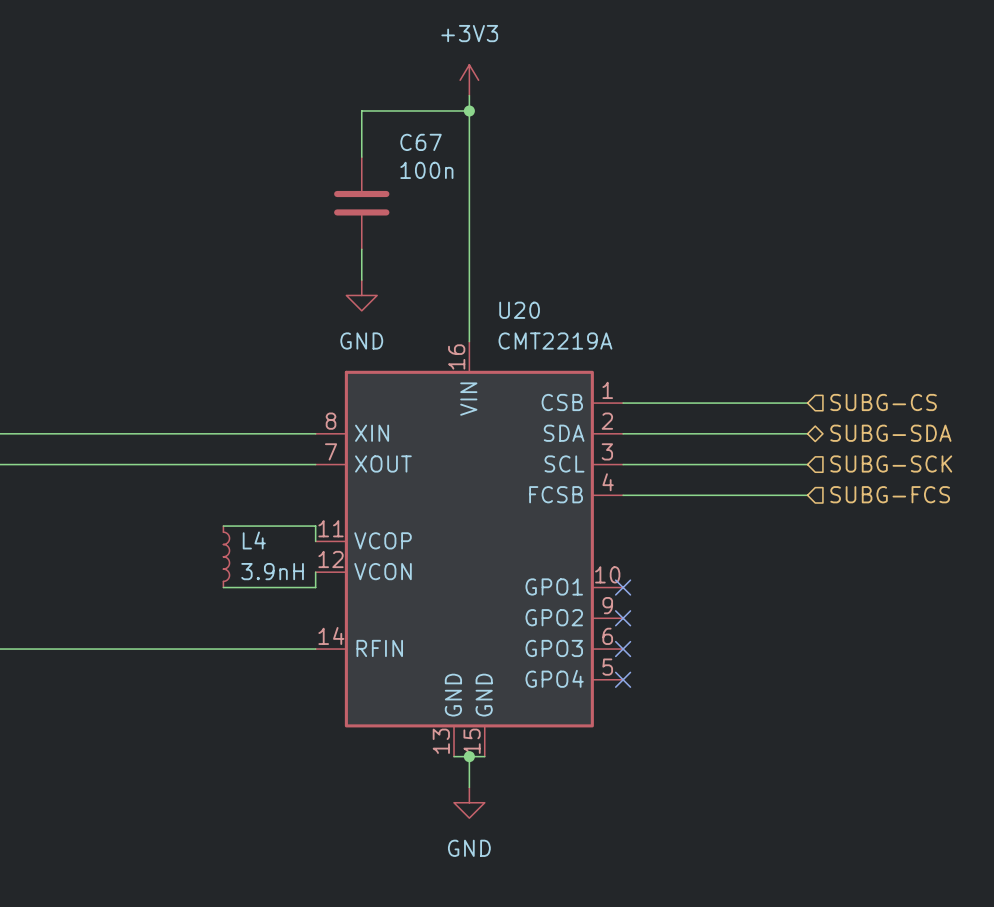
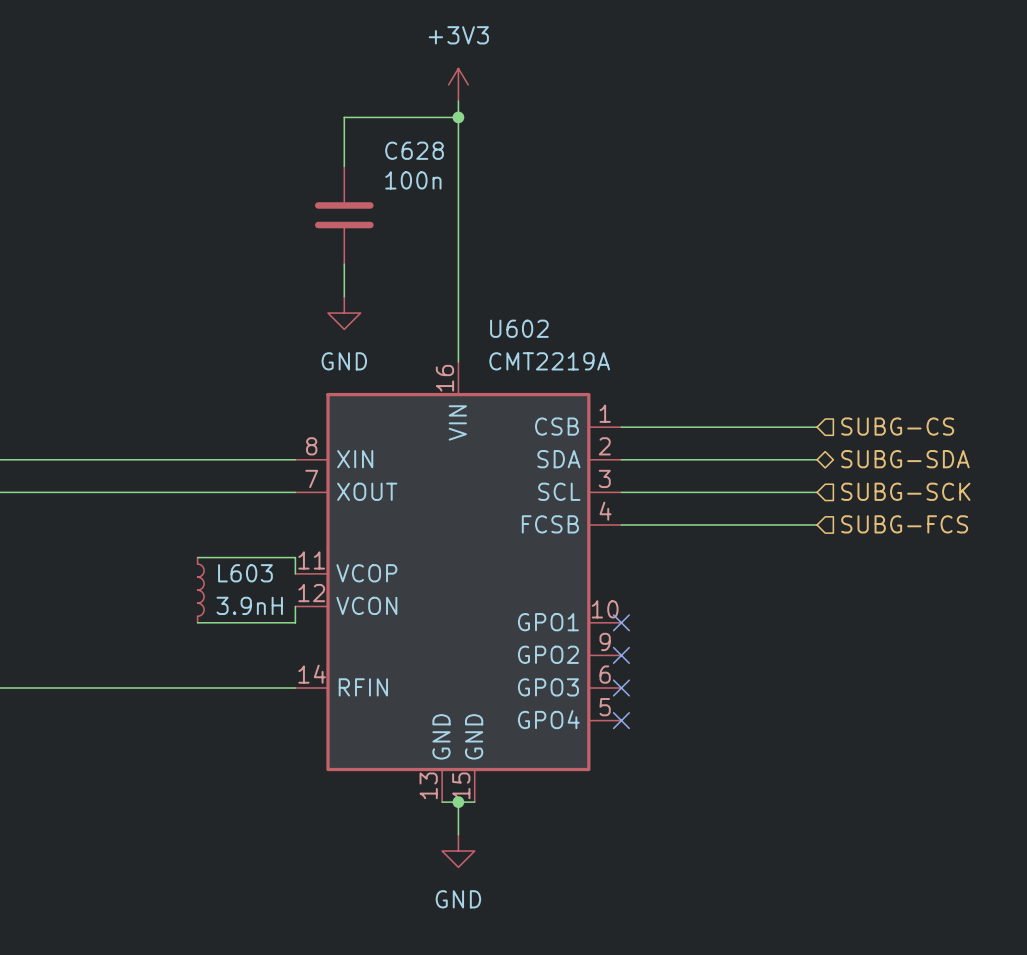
C67 name: C67 (421, 142) -> C628 (414, 150)
U20 name: U20 (519, 310) -> U602 (519, 328)
L4 name: L4 (254, 540) -> L603 (245, 573)

